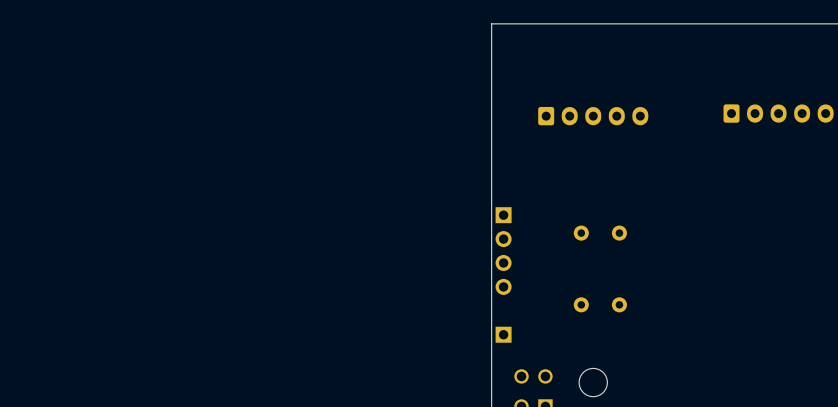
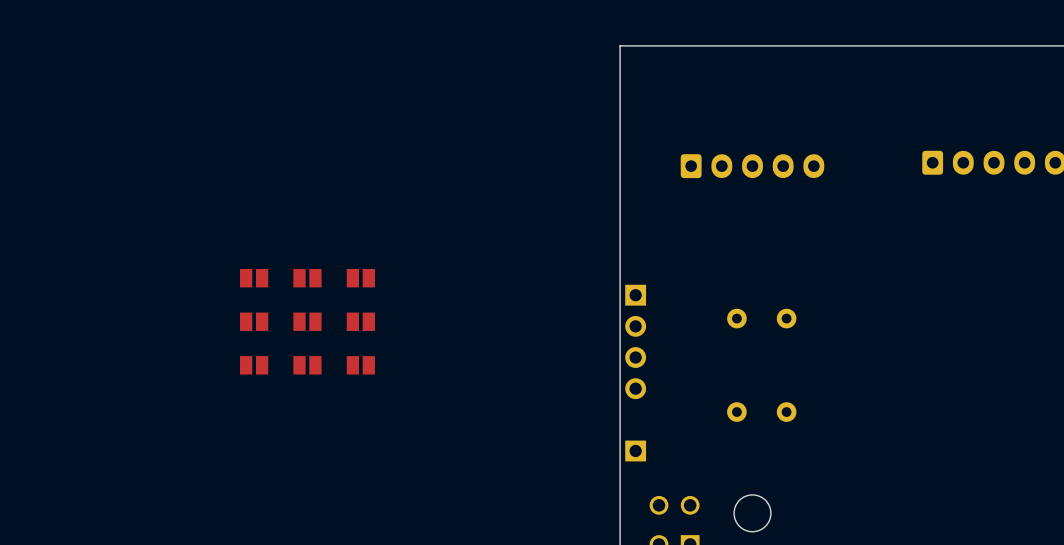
part: none -> (254, 278)
part: none -> (307, 278)
part: none -> (360, 278)
part: none -> (254, 321)
part: none -> (307, 321)
part: none -> (360, 321)
part: none -> (254, 365)
part: none -> (307, 365)
part: none -> (360, 365)

